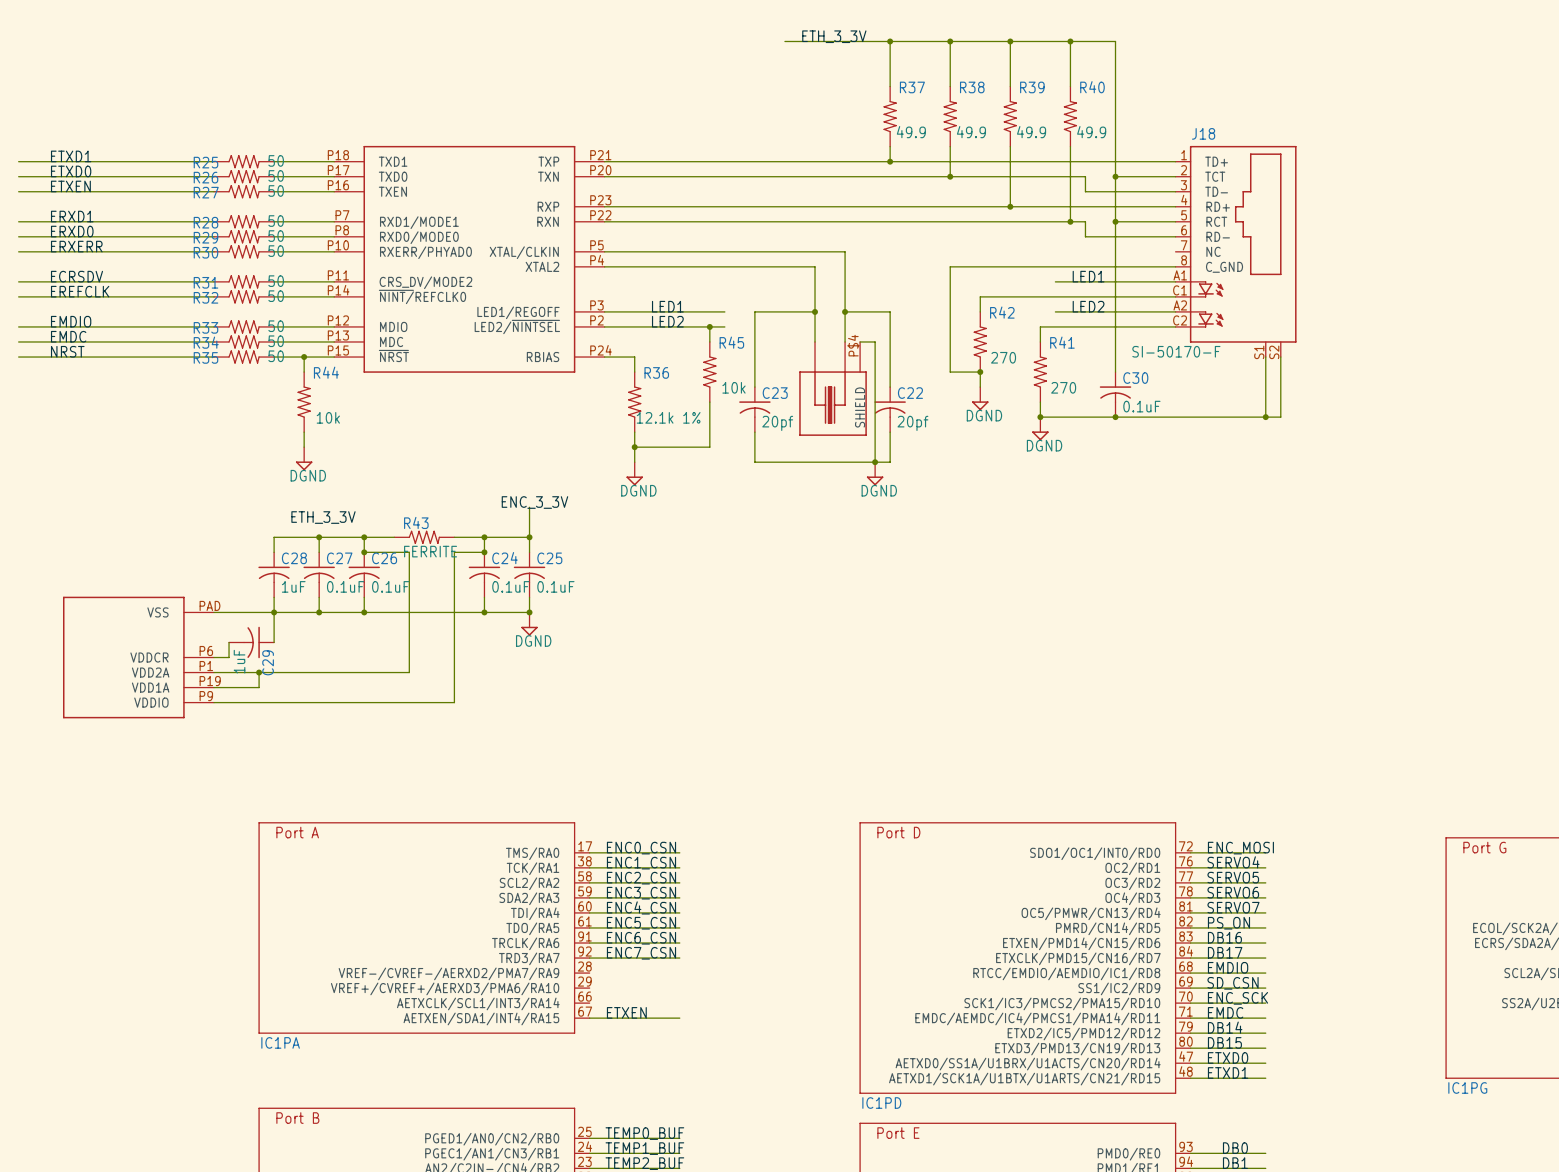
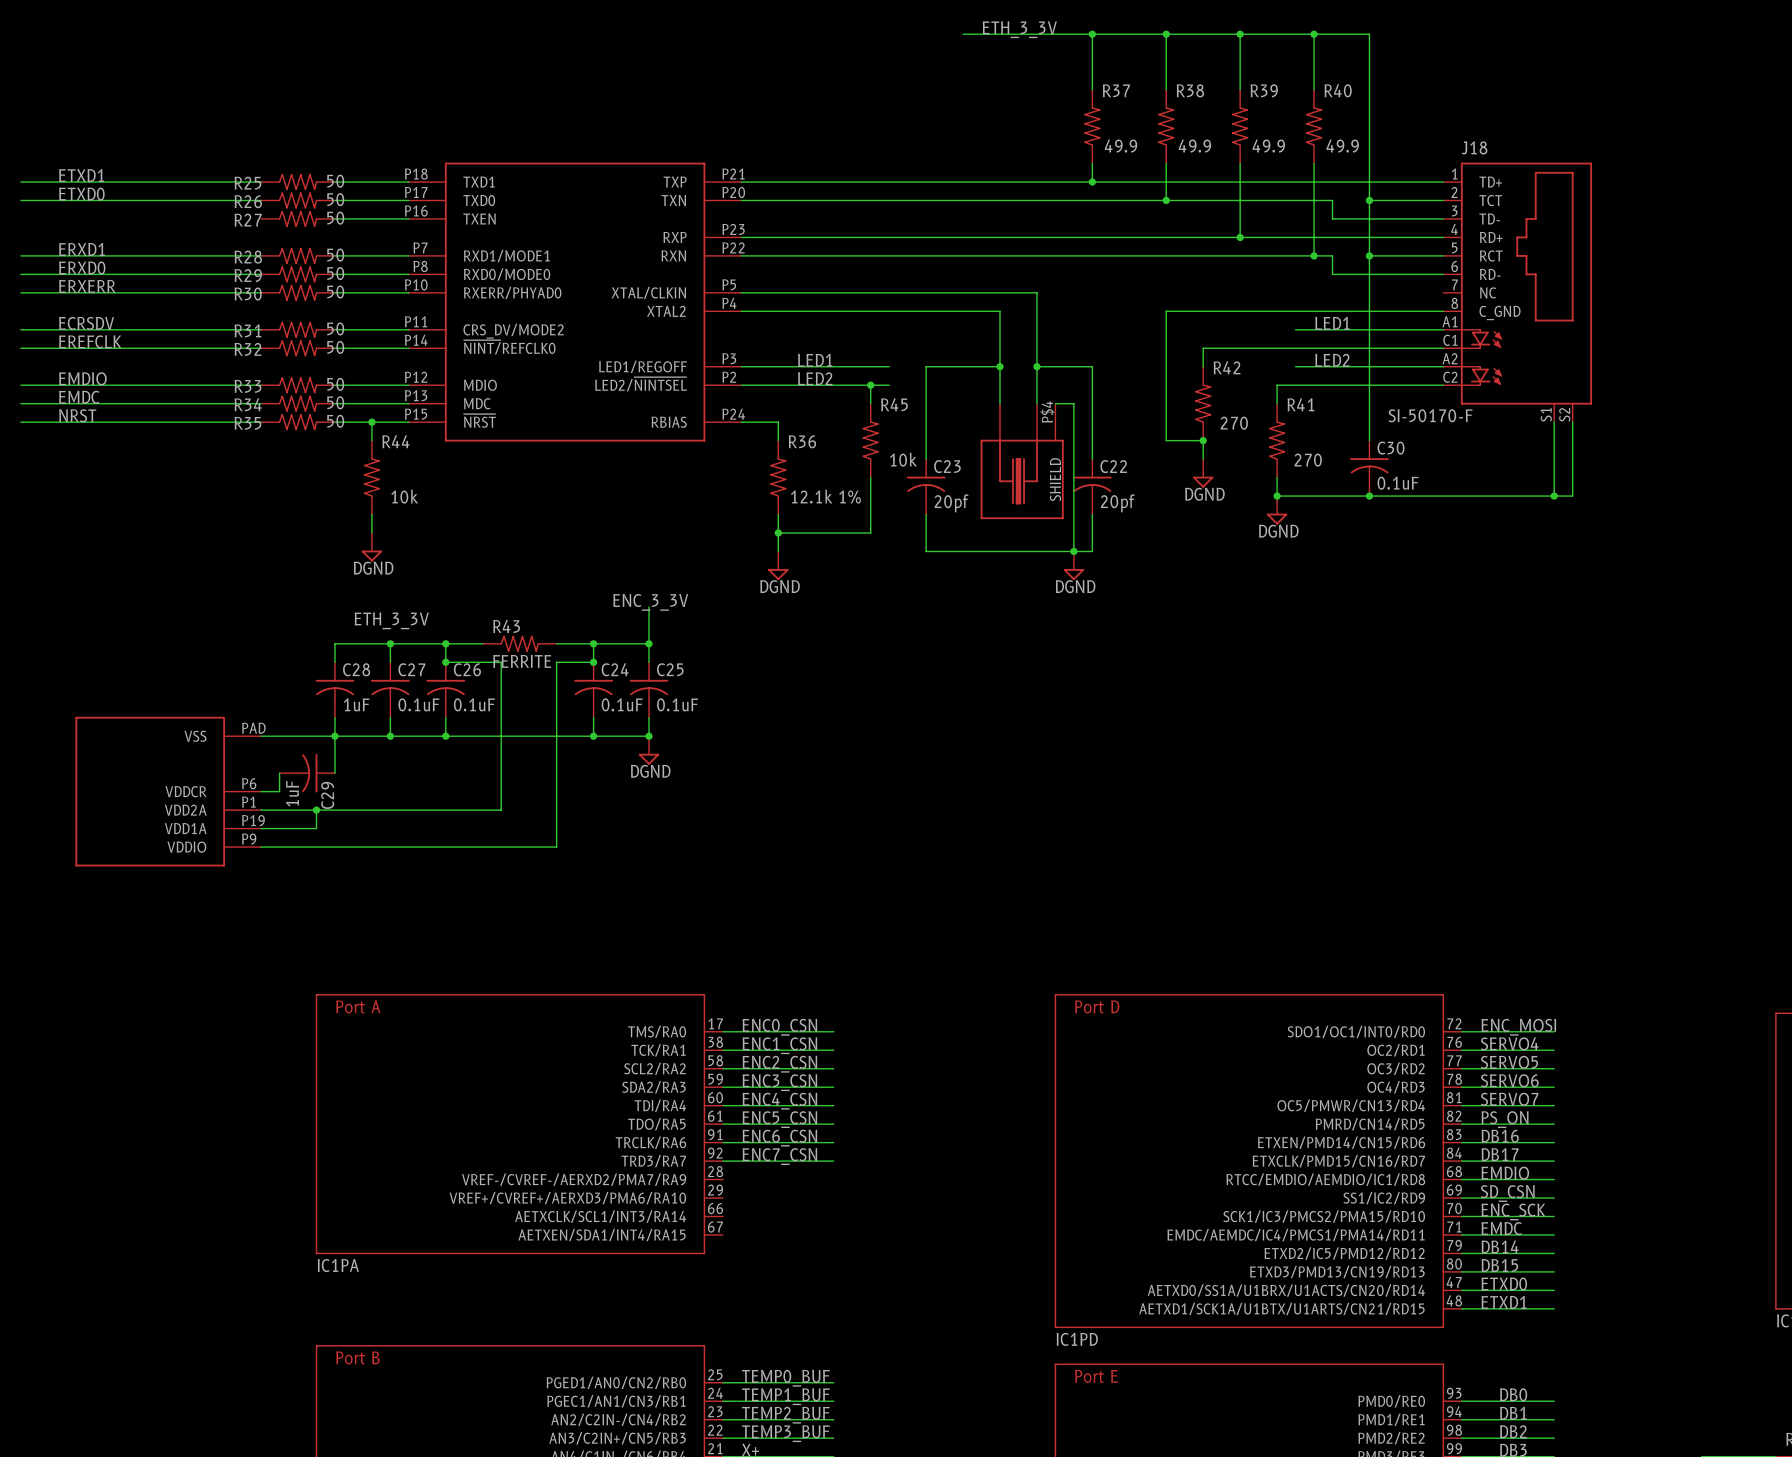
label: ETXEN (70, 186) -> none
wire: (18, 191) (213, 191) -> none
label: ETXEN (626, 1012) -> none
wire: (589, 1018) (679, 1018) -> none

